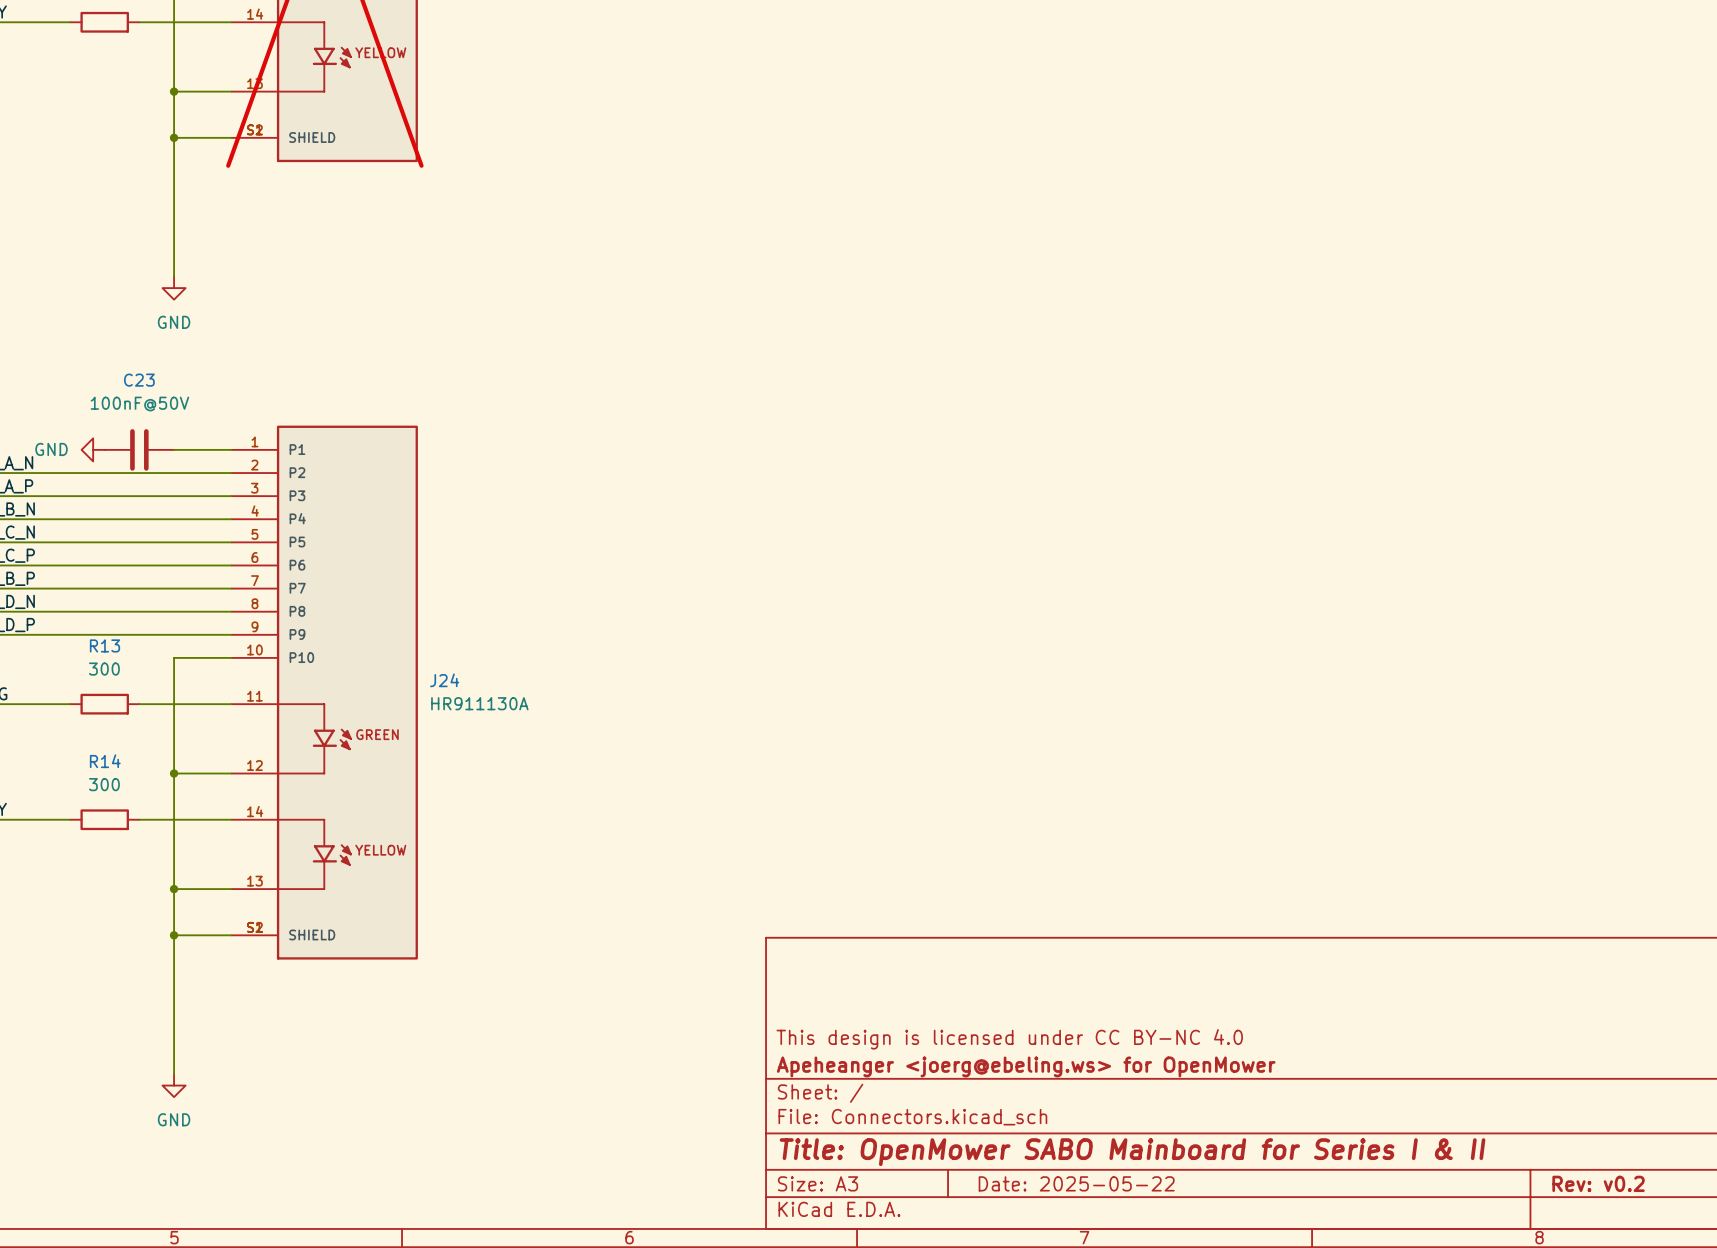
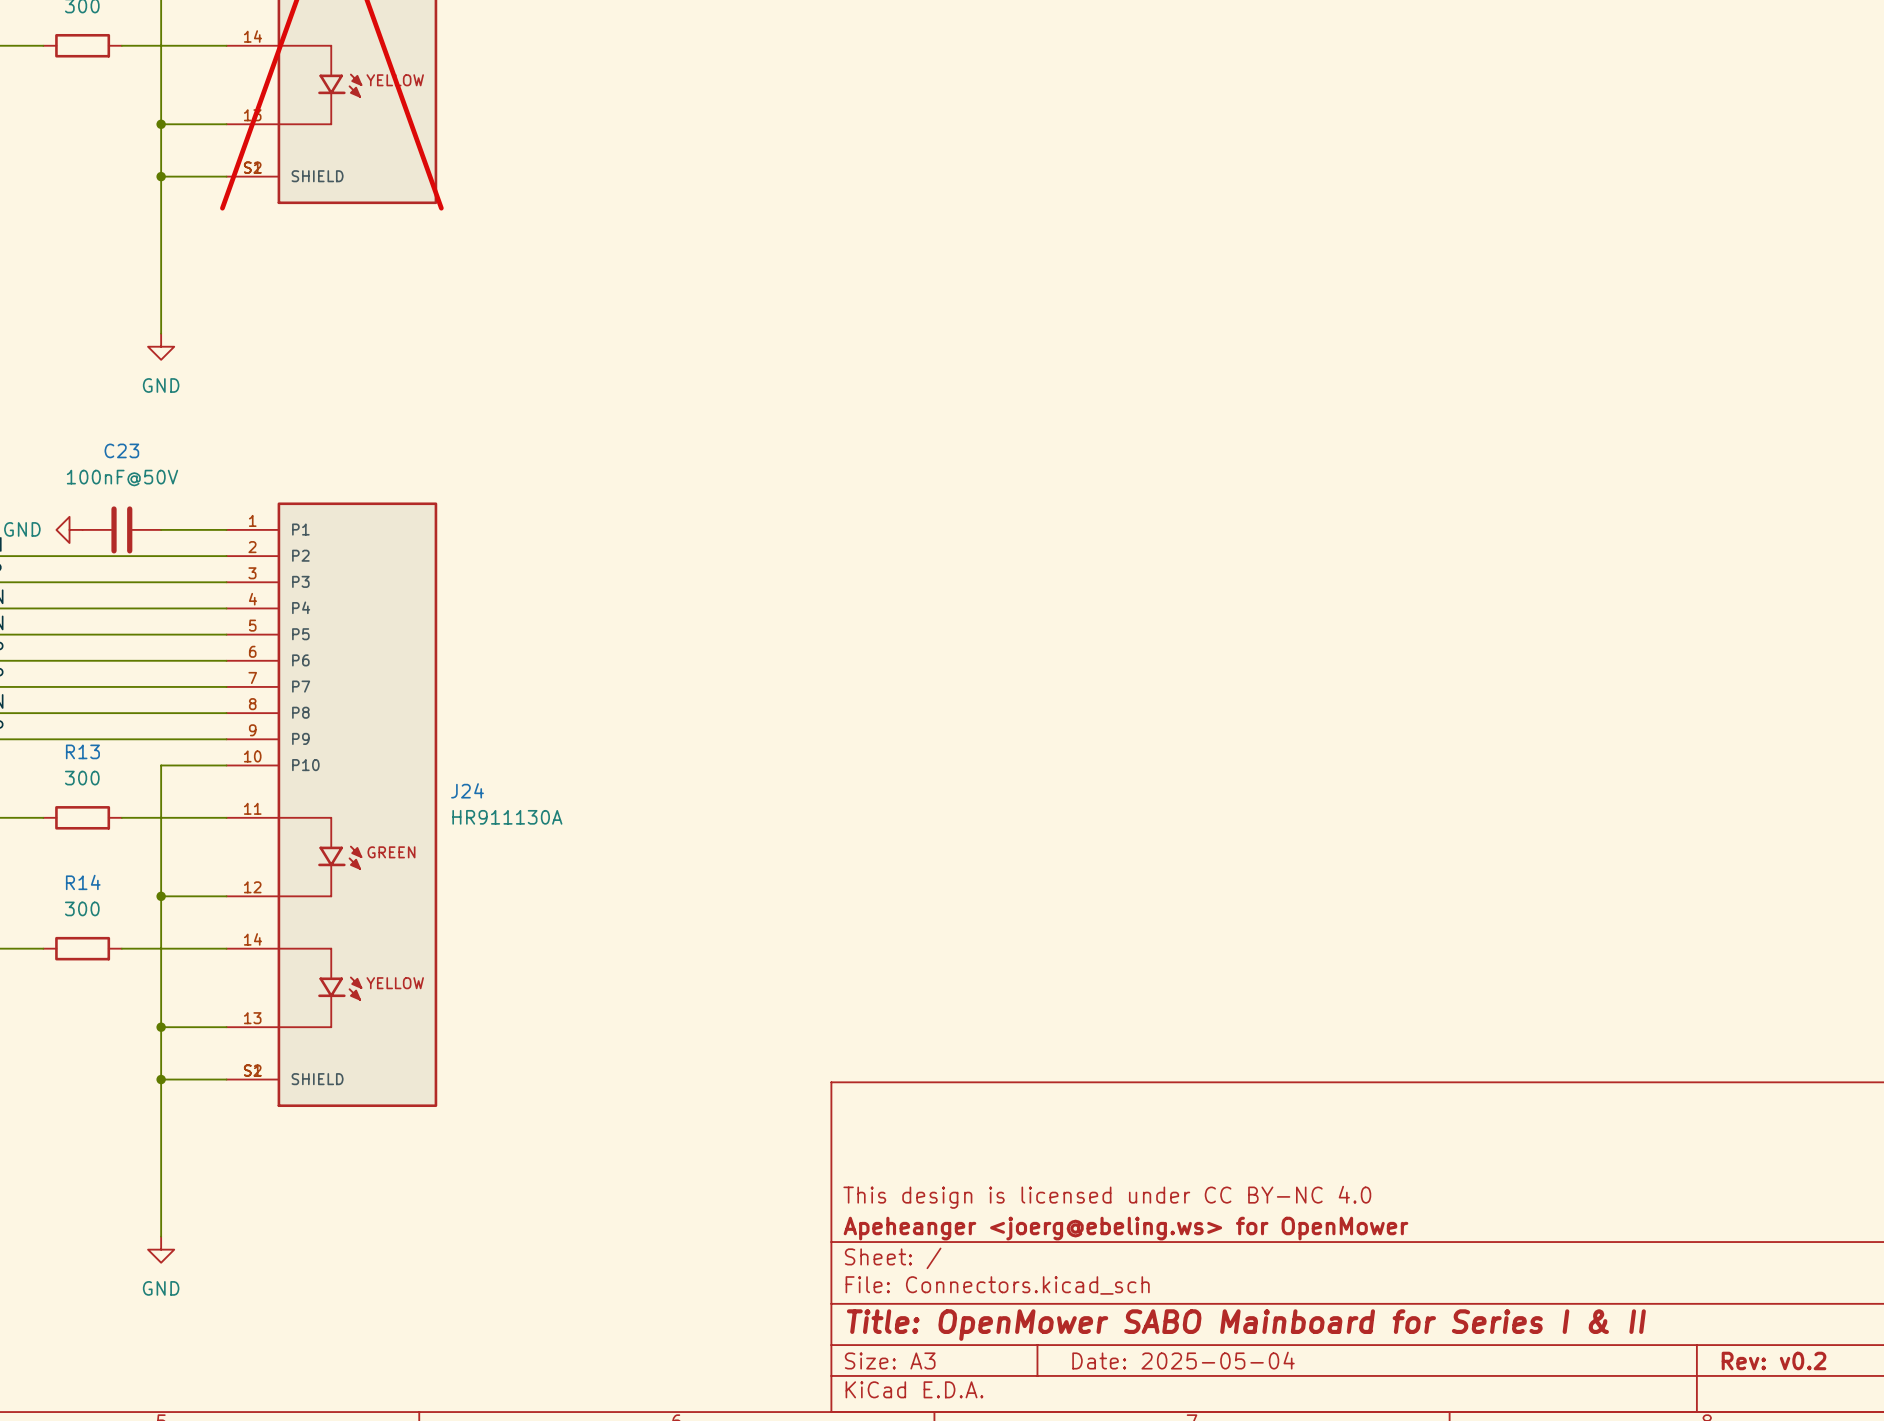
title block: Date: 2025-05-22 (1076, 1183) -> Date: 2025-05-04 (1183, 1360)

